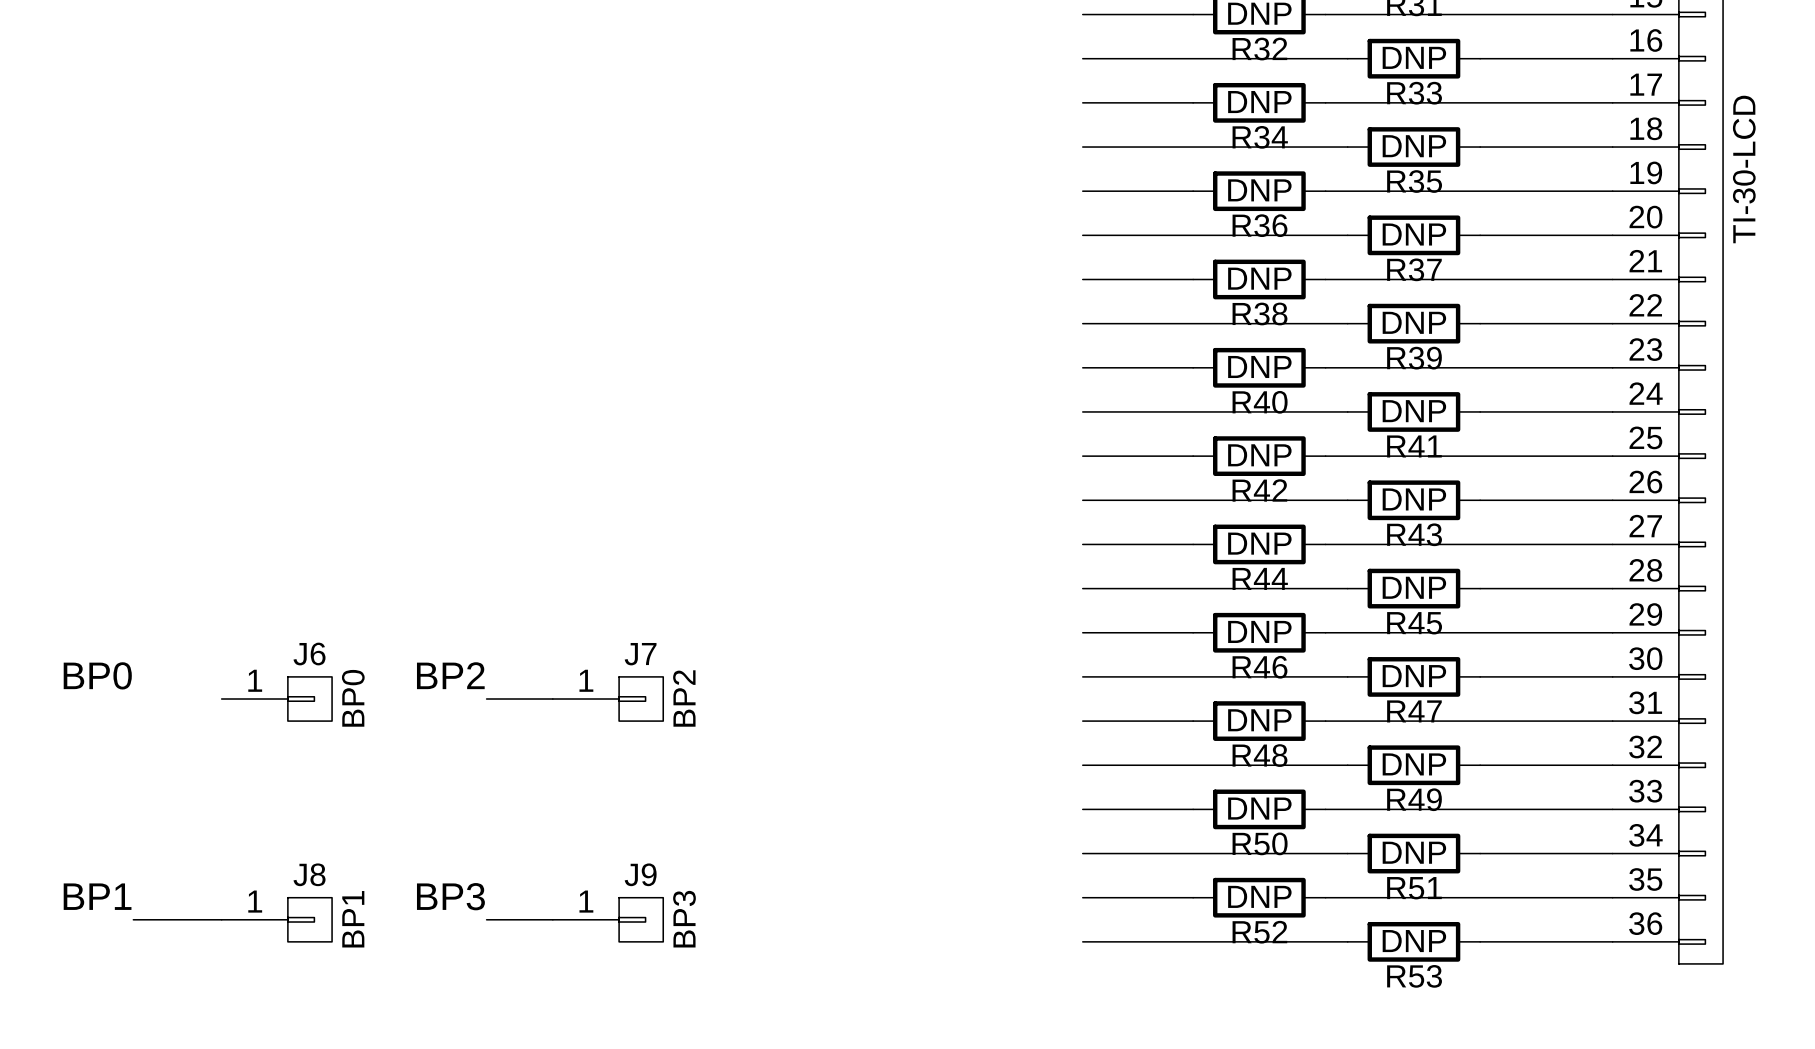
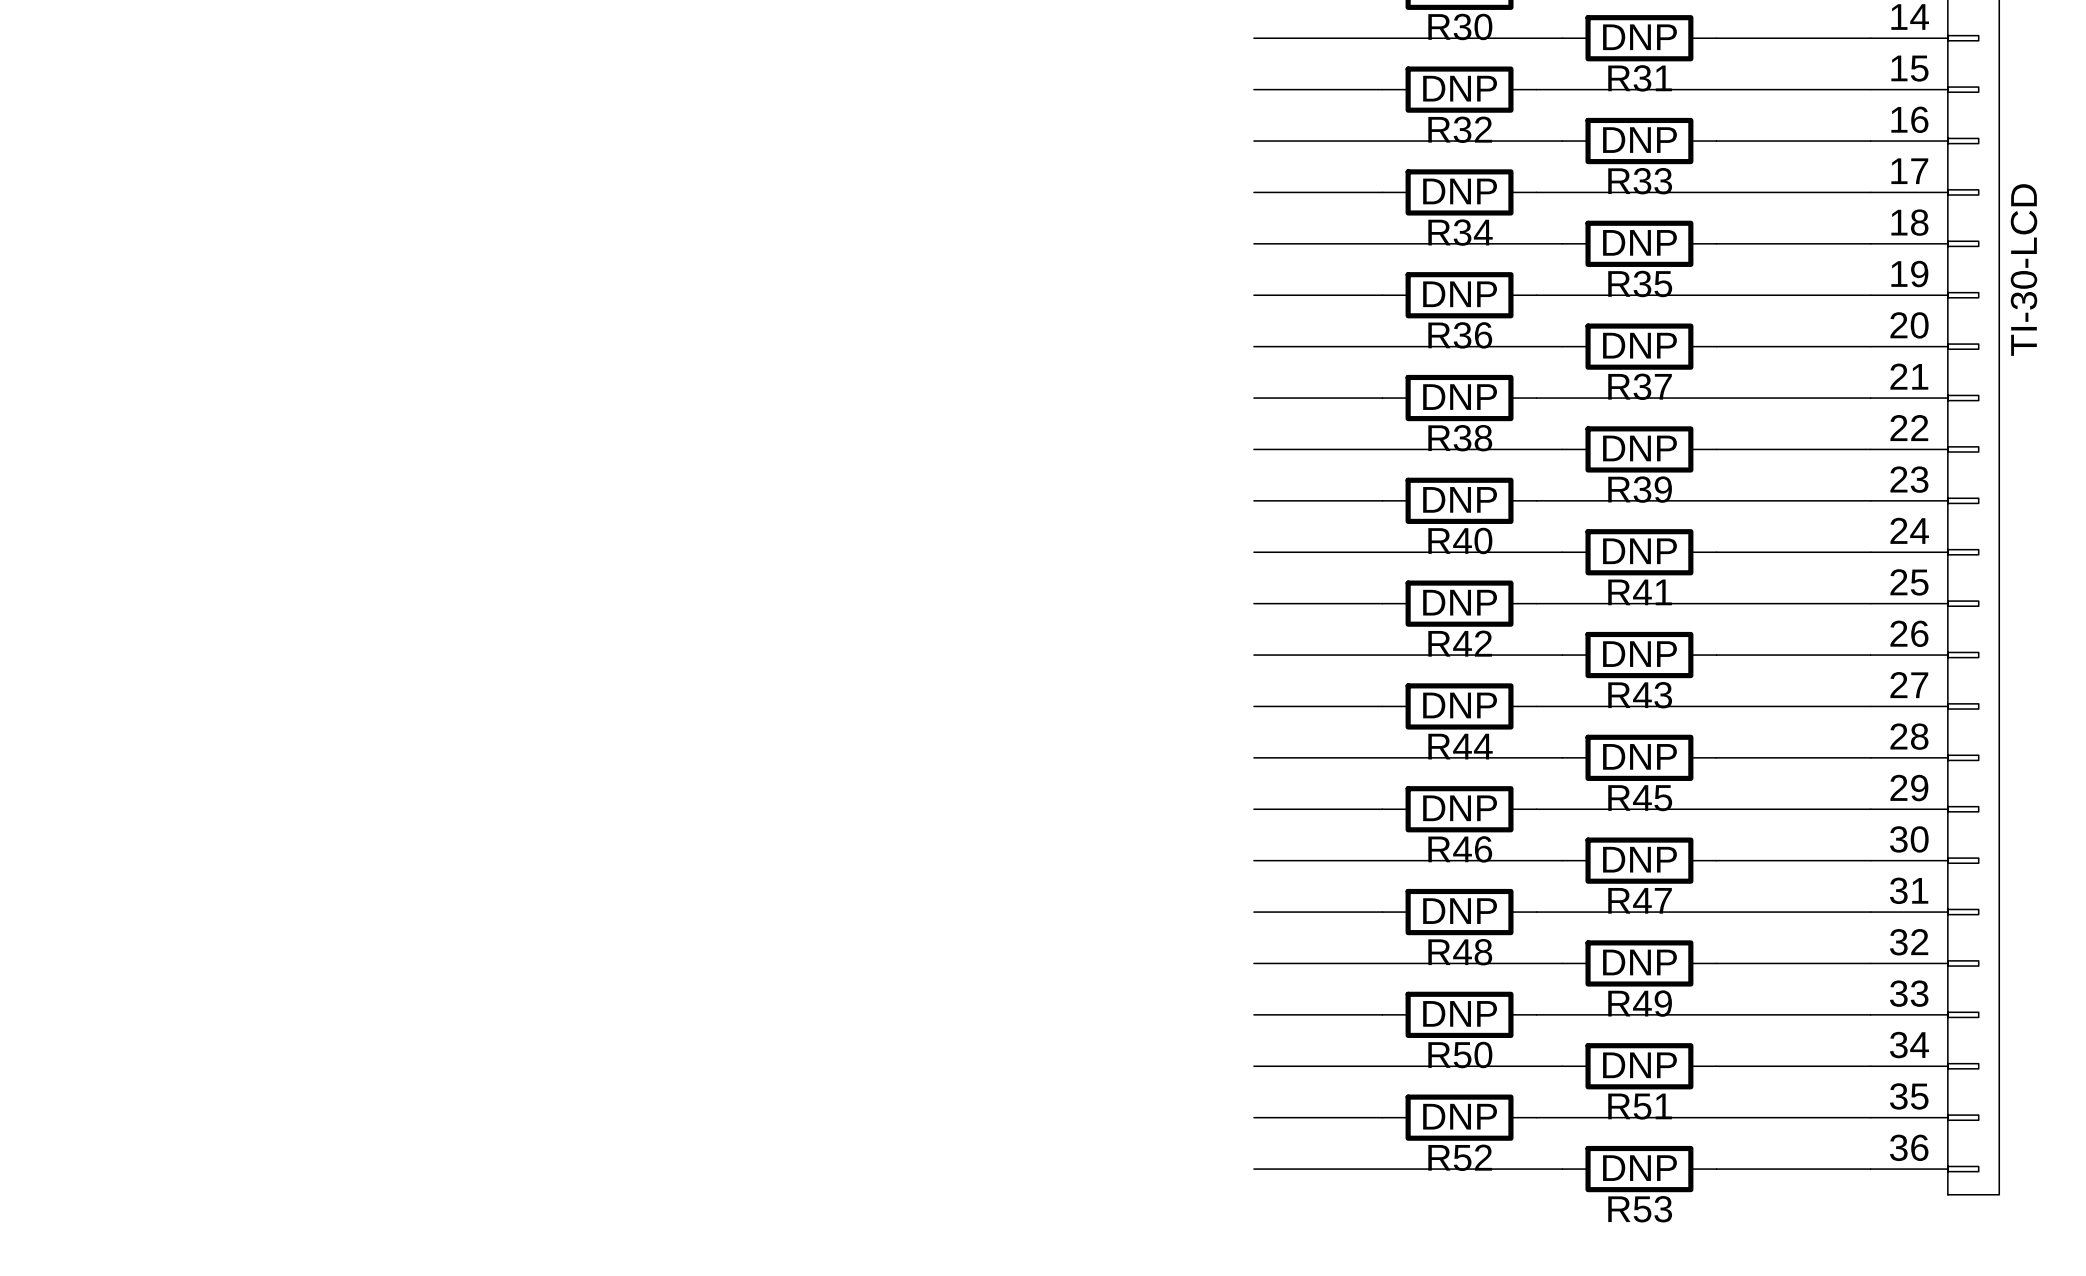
label: BP0 (97, 675) -> none
label: BP2 (450, 675) -> none
J6: BP0 (276, 699) -> none
wire: (486, 699) (552, 699) -> none
J7: BP2 (608, 699) -> none
label: BP1 (97, 896) -> none
label: BP3 (450, 896) -> none
wire: (133, 919) (221, 919) -> none
J8: BP1 (276, 919) -> none
wire: (486, 919) (552, 919) -> none
J9: BP3 (608, 919) -> none

